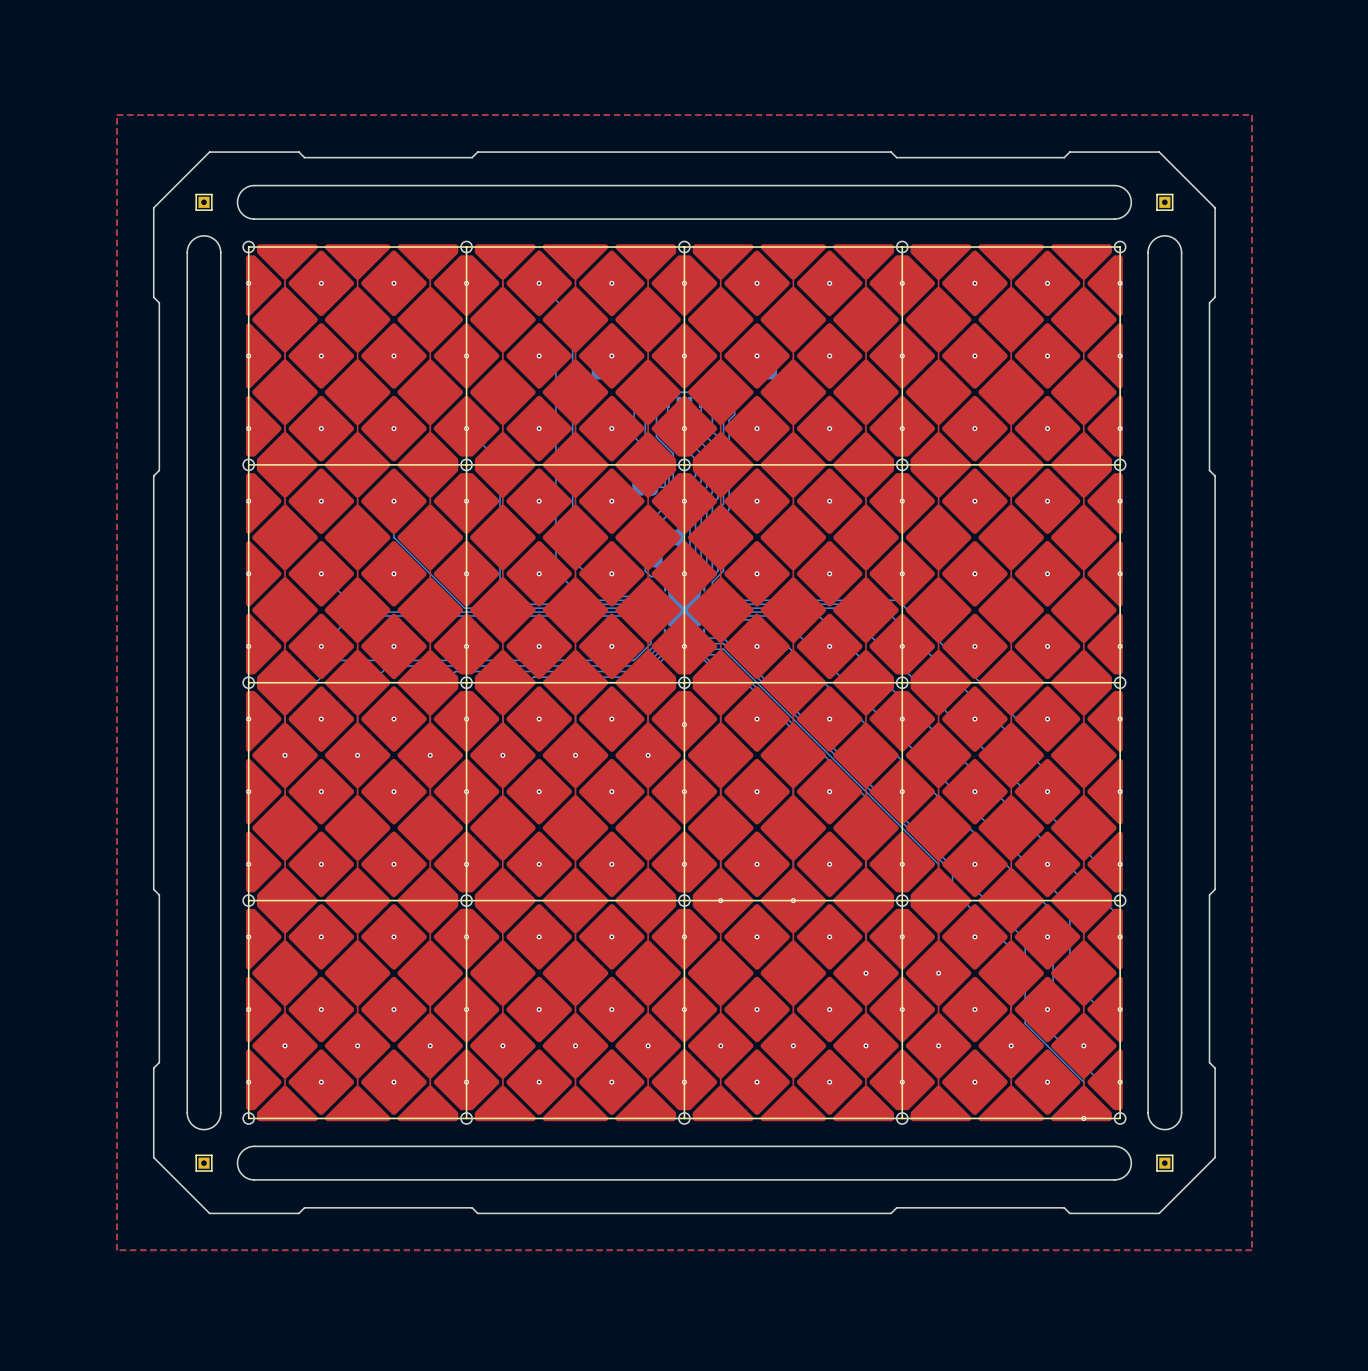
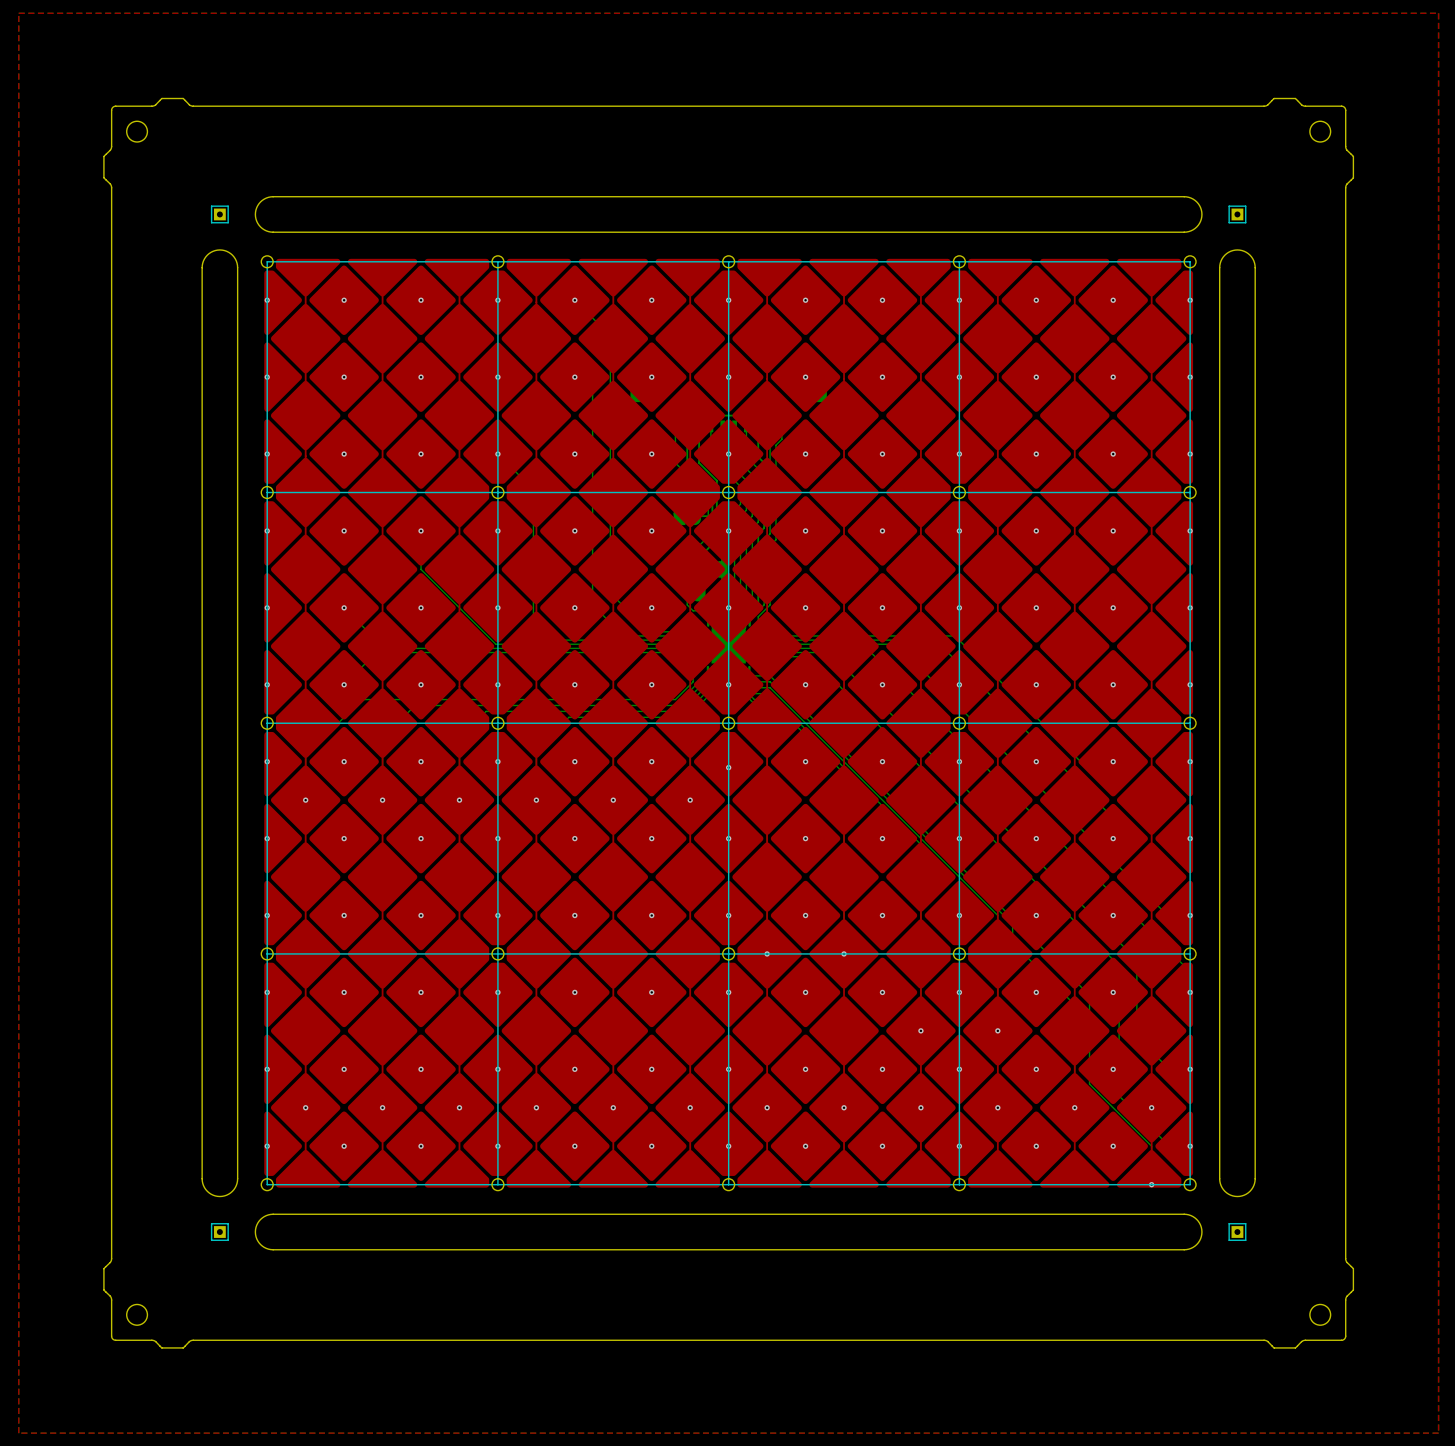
drawing: none -> [103, 98, 1354, 1349]
top zone outline: (116, 115) (116, 1250) (1251, 1250) (1251, 115) (116, 115) -> (18, 13) (18, 1433) (1438, 1433) (1438, 13) (18, 13)
board edge: (209, 152) (298, 152) (304, 157) (472, 157) (477, 152) (891, 152) (896, 157) (1064, 157) (1069, 152) (1159, 152) (1215, 207) (1215, 297) (1209, 302) (1209, 470) (1215, 476) (1215, 889) (1209, 895) (1209, 1062) (1215, 1068) (1215, 1157) (1159, 1213) (1069, 1213) (1064, 1207) (896, 1207) (891, 1213) (477, 1213) (472, 1207) (304, 1207) (298, 1213) (209, 1213) (153, 1157) (153, 1068) (159, 1062) (159, 895) (153, 889) (153, 476) (159, 470) (159, 302) (153, 297) (153, 207) (209, 152) -> none

